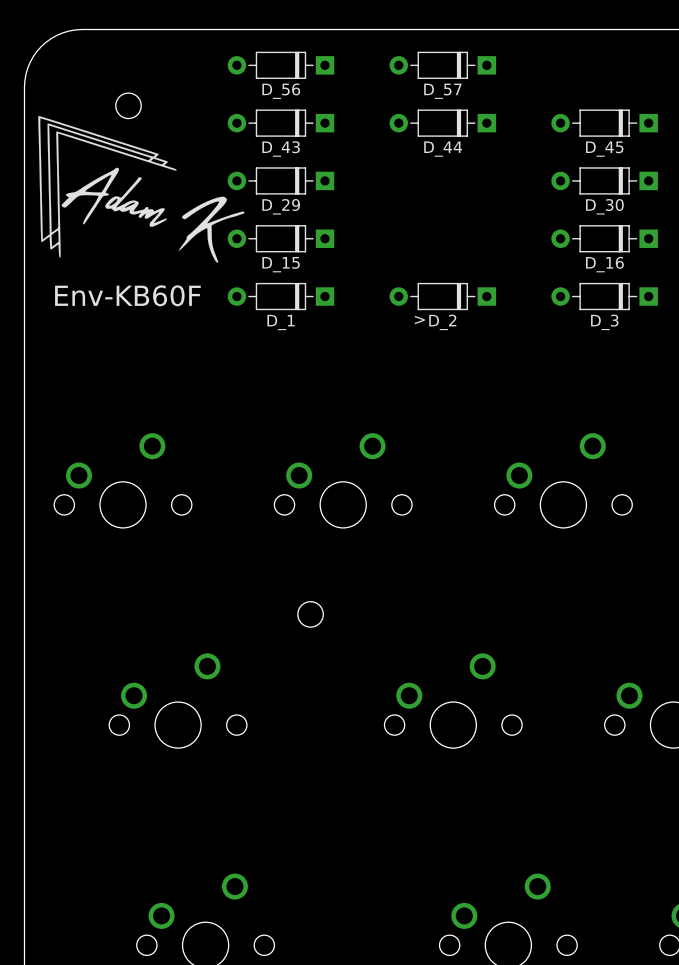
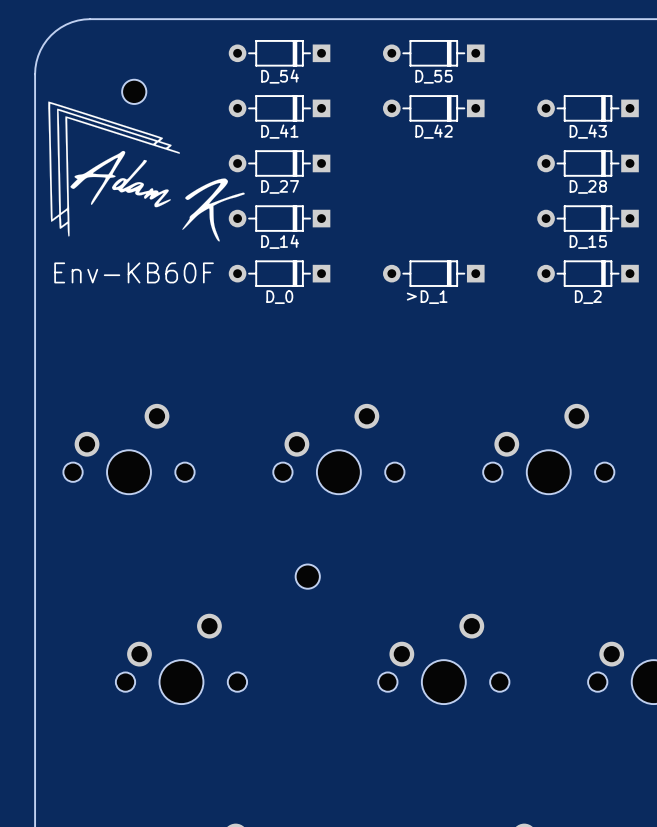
D_56 name: D_56 (281, 91) -> D_54 (280, 76)
D_57 name: D_57 (442, 91) -> D_55 (434, 76)
D_43 name: D_43 (281, 148) -> D_41 (279, 131)
D_44 name: D_44 (443, 149) -> D_42 (434, 131)
D_45 name: D_45 (604, 149) -> D_43 (588, 131)
D_29 name: D_29 (281, 206) -> D_27 (280, 186)
D_30 name: D_30 (604, 206) -> D_28 (588, 186)
D_15 name: D_15 (281, 264) -> D_14 (280, 241)
D_16 name: D_16 (604, 264) -> D_15 (588, 242)
D_1 name: D_1 (281, 322) -> D_0 (279, 297)
D_2 name: D_2 (442, 322) -> D_1 (434, 297)
D_3 name: D_3 (604, 322) -> D_2 (588, 297)

